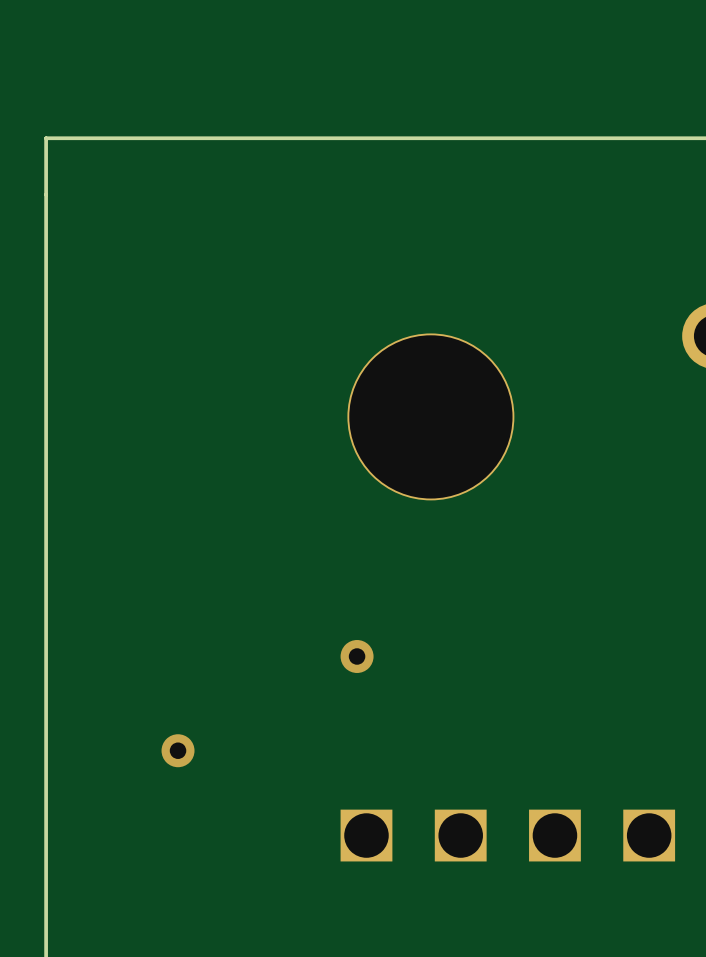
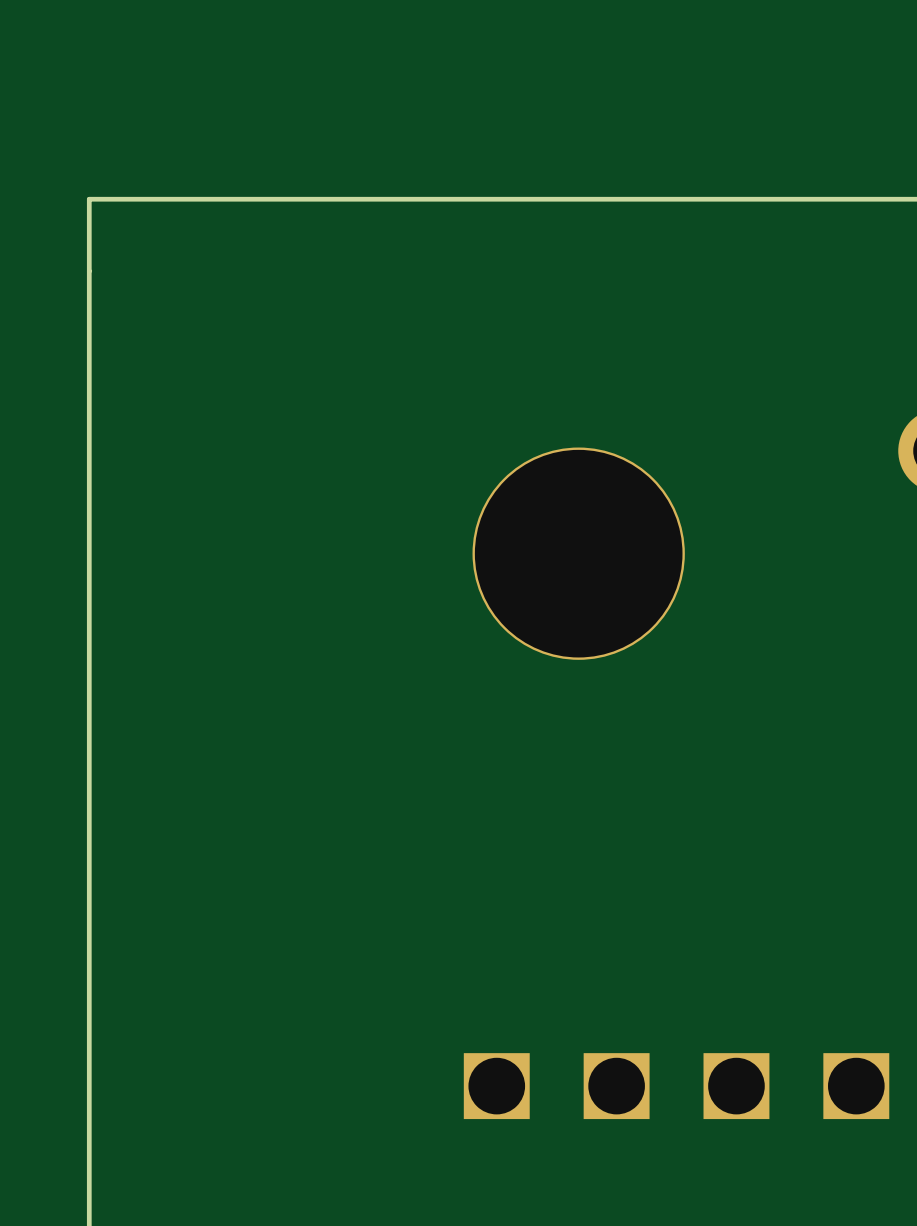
via: (357, 656) -> none
via: (178, 750) -> none

